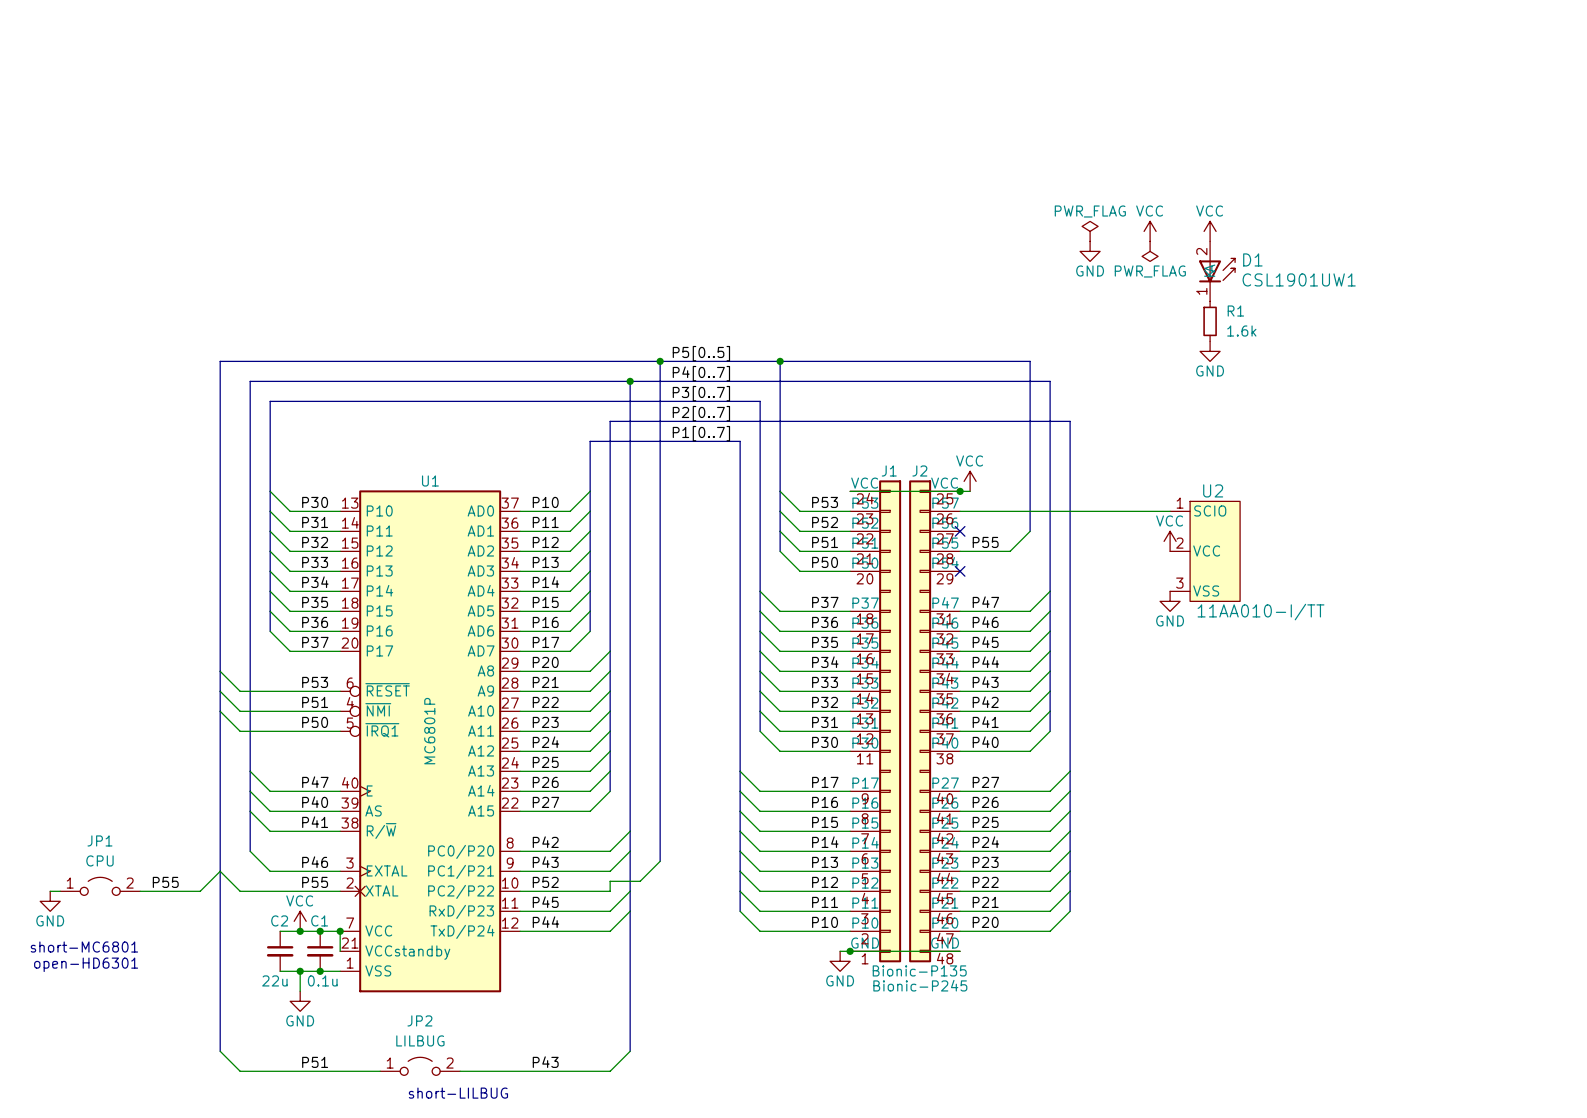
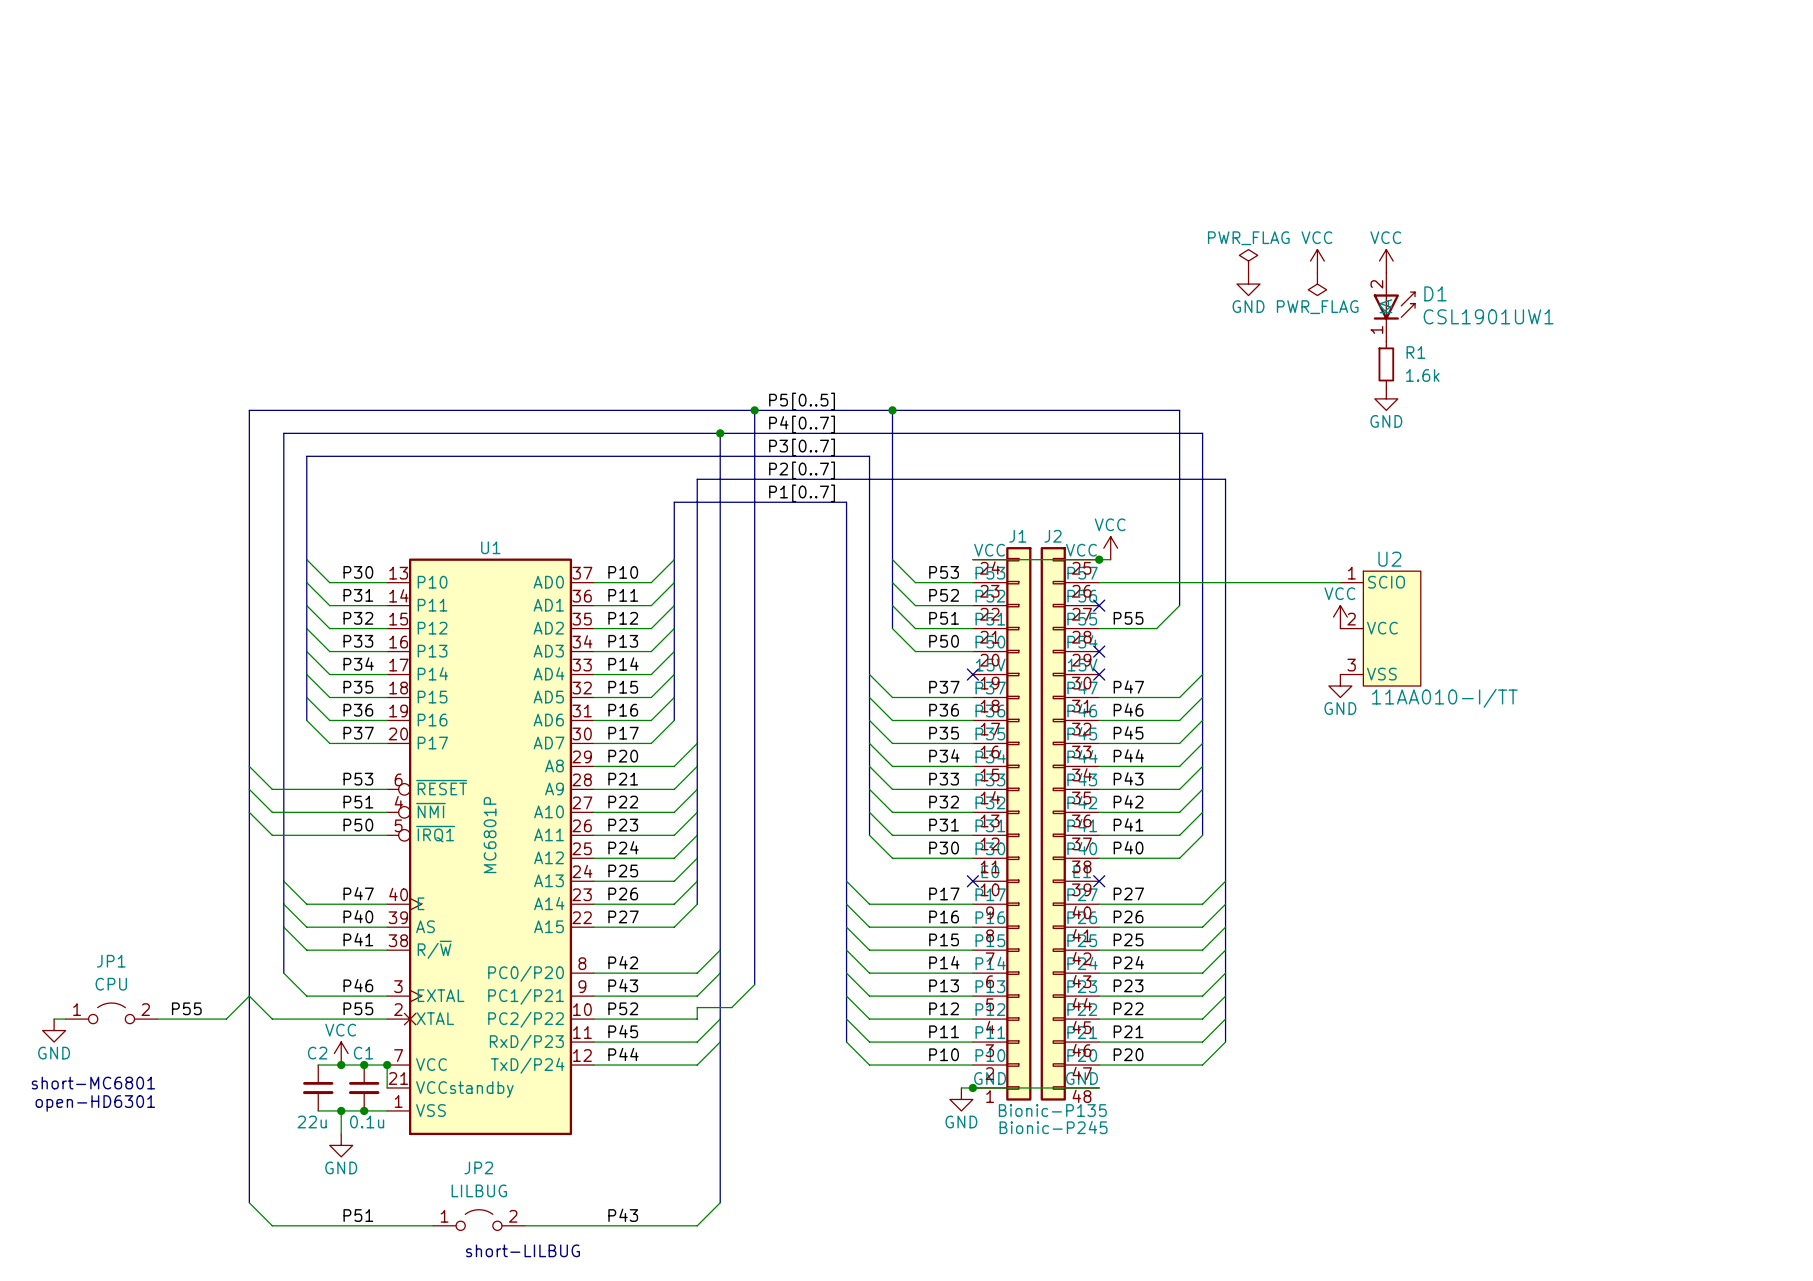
J1 symbol: [850, 480, 902, 963] -> [972, 547, 1032, 1101]
J2 symbol: [909, 480, 961, 963] -> [1040, 547, 1100, 1101]
no-connect mark: none -> (972, 674)
no-connect mark: none -> (1099, 674)
no-connect mark: none -> (972, 881)
no-connect mark: none -> (1099, 881)

